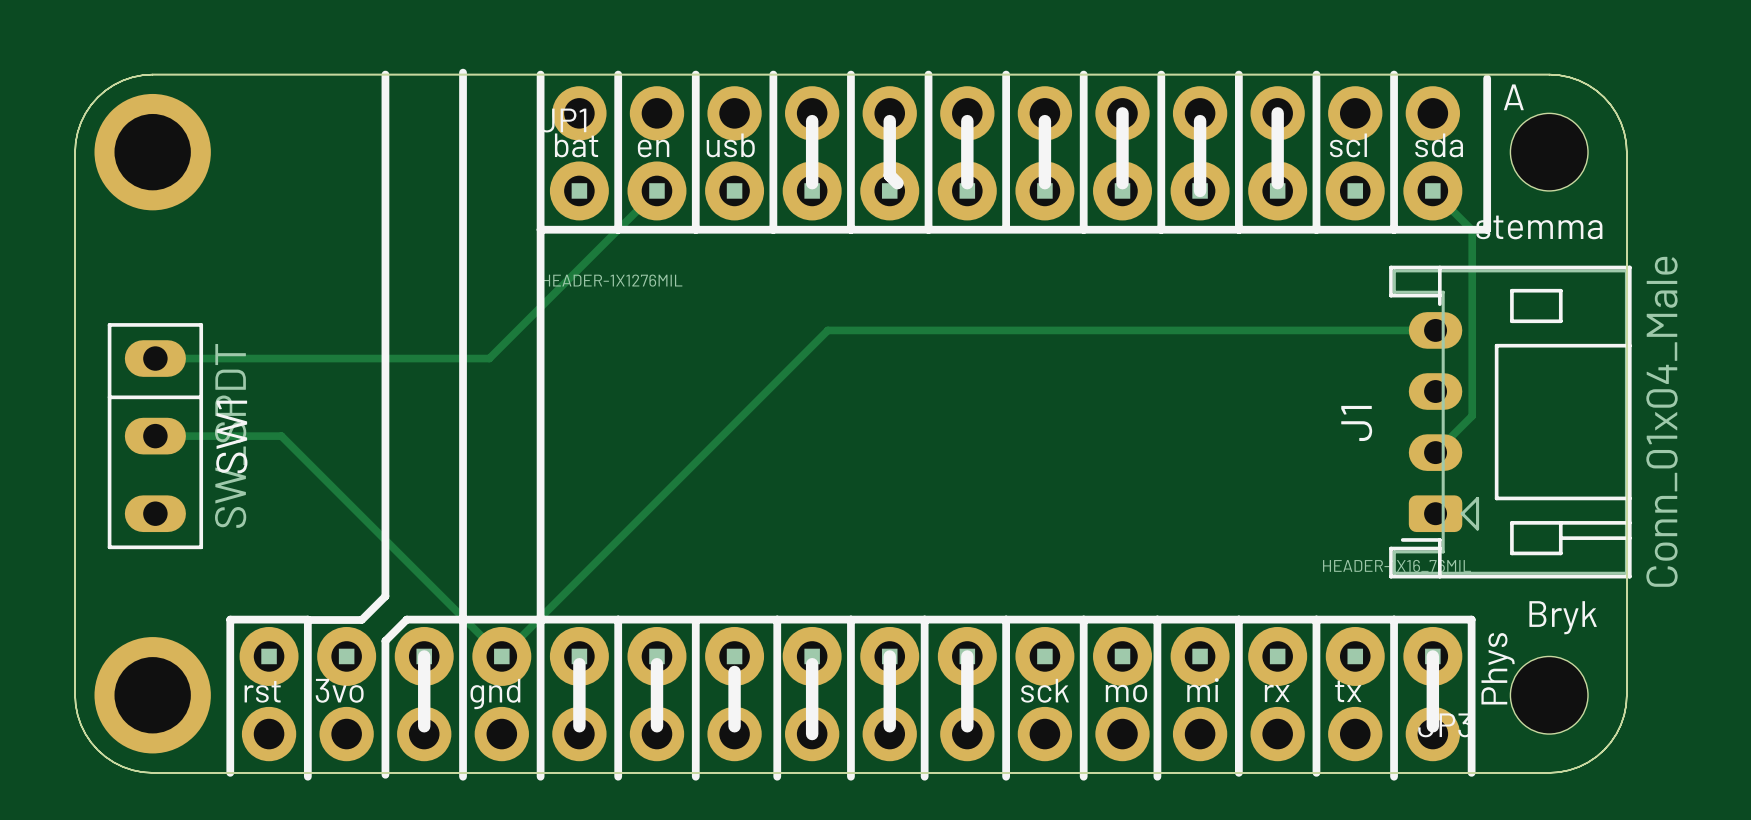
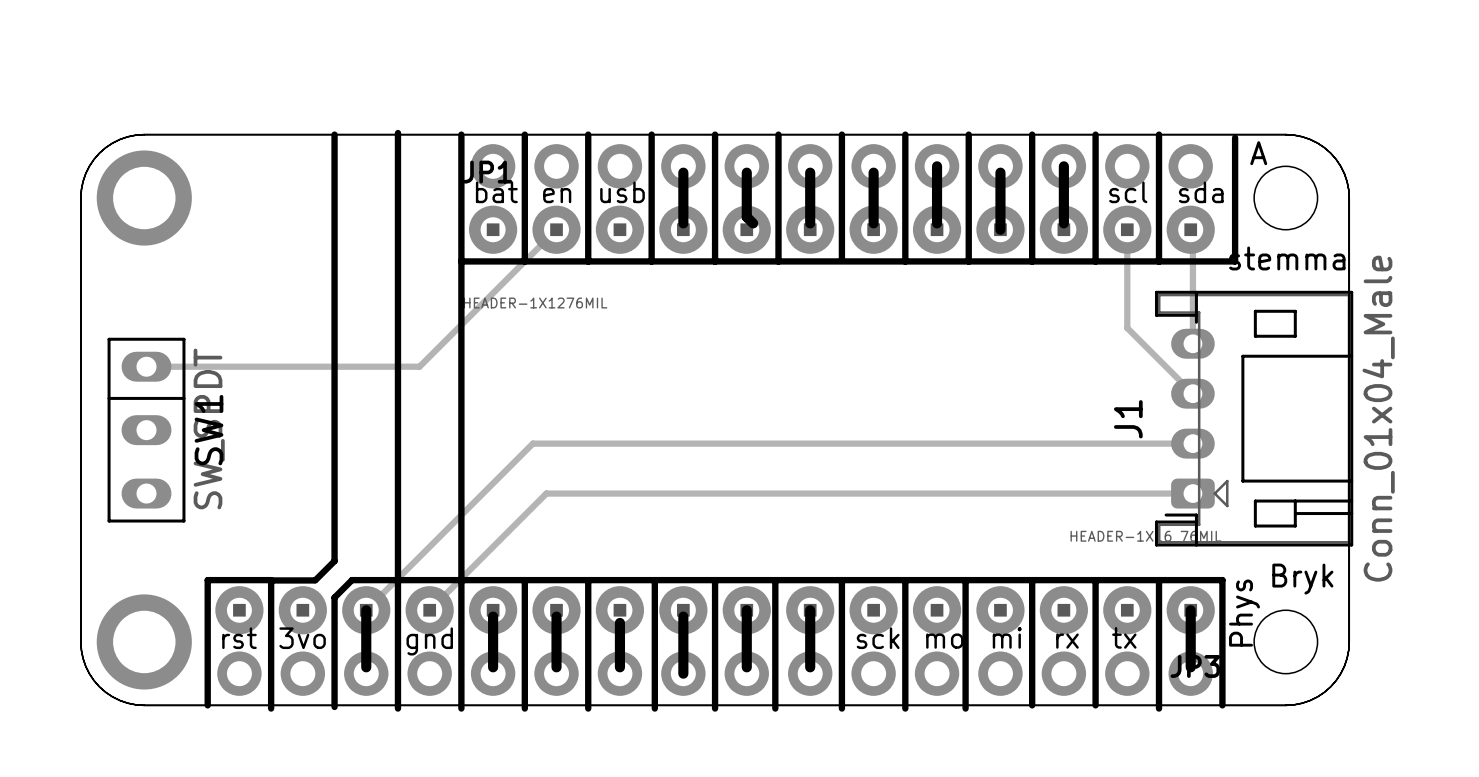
track: none -> (1127, 229) (1127, 328) (1192, 393)
track: (1435, 193) (1472, 230) (1472, 415) (1435, 452) -> (1192, 231) (1192, 343)
track: (1435, 330) (827, 330) (644, 513) -> (1192, 493) (546, 493)
track: (155, 436) (281, 436) (501, 656) -> none
track: none -> (1192, 443) (532, 443) (366, 610)

